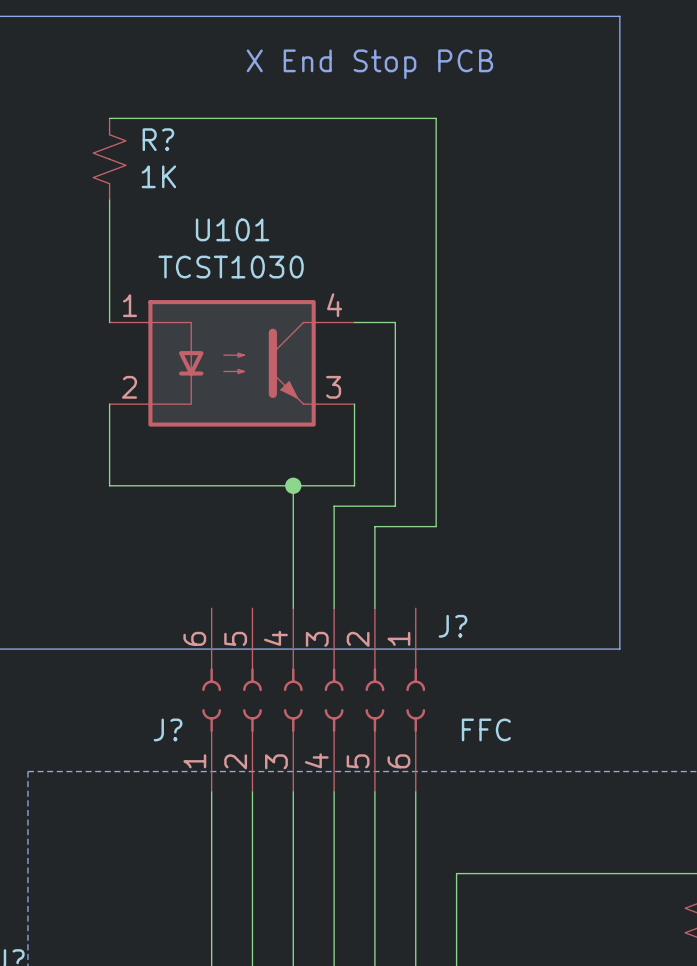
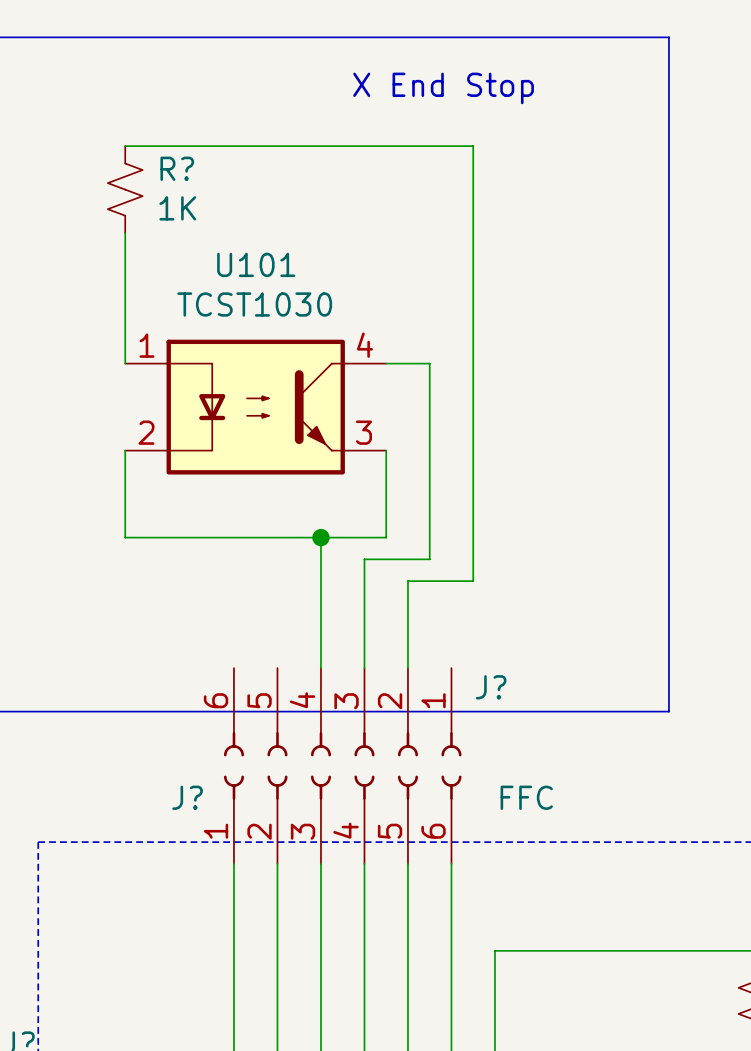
text: X End Stop PCB (369, 64) -> X End Stop (443, 88)

